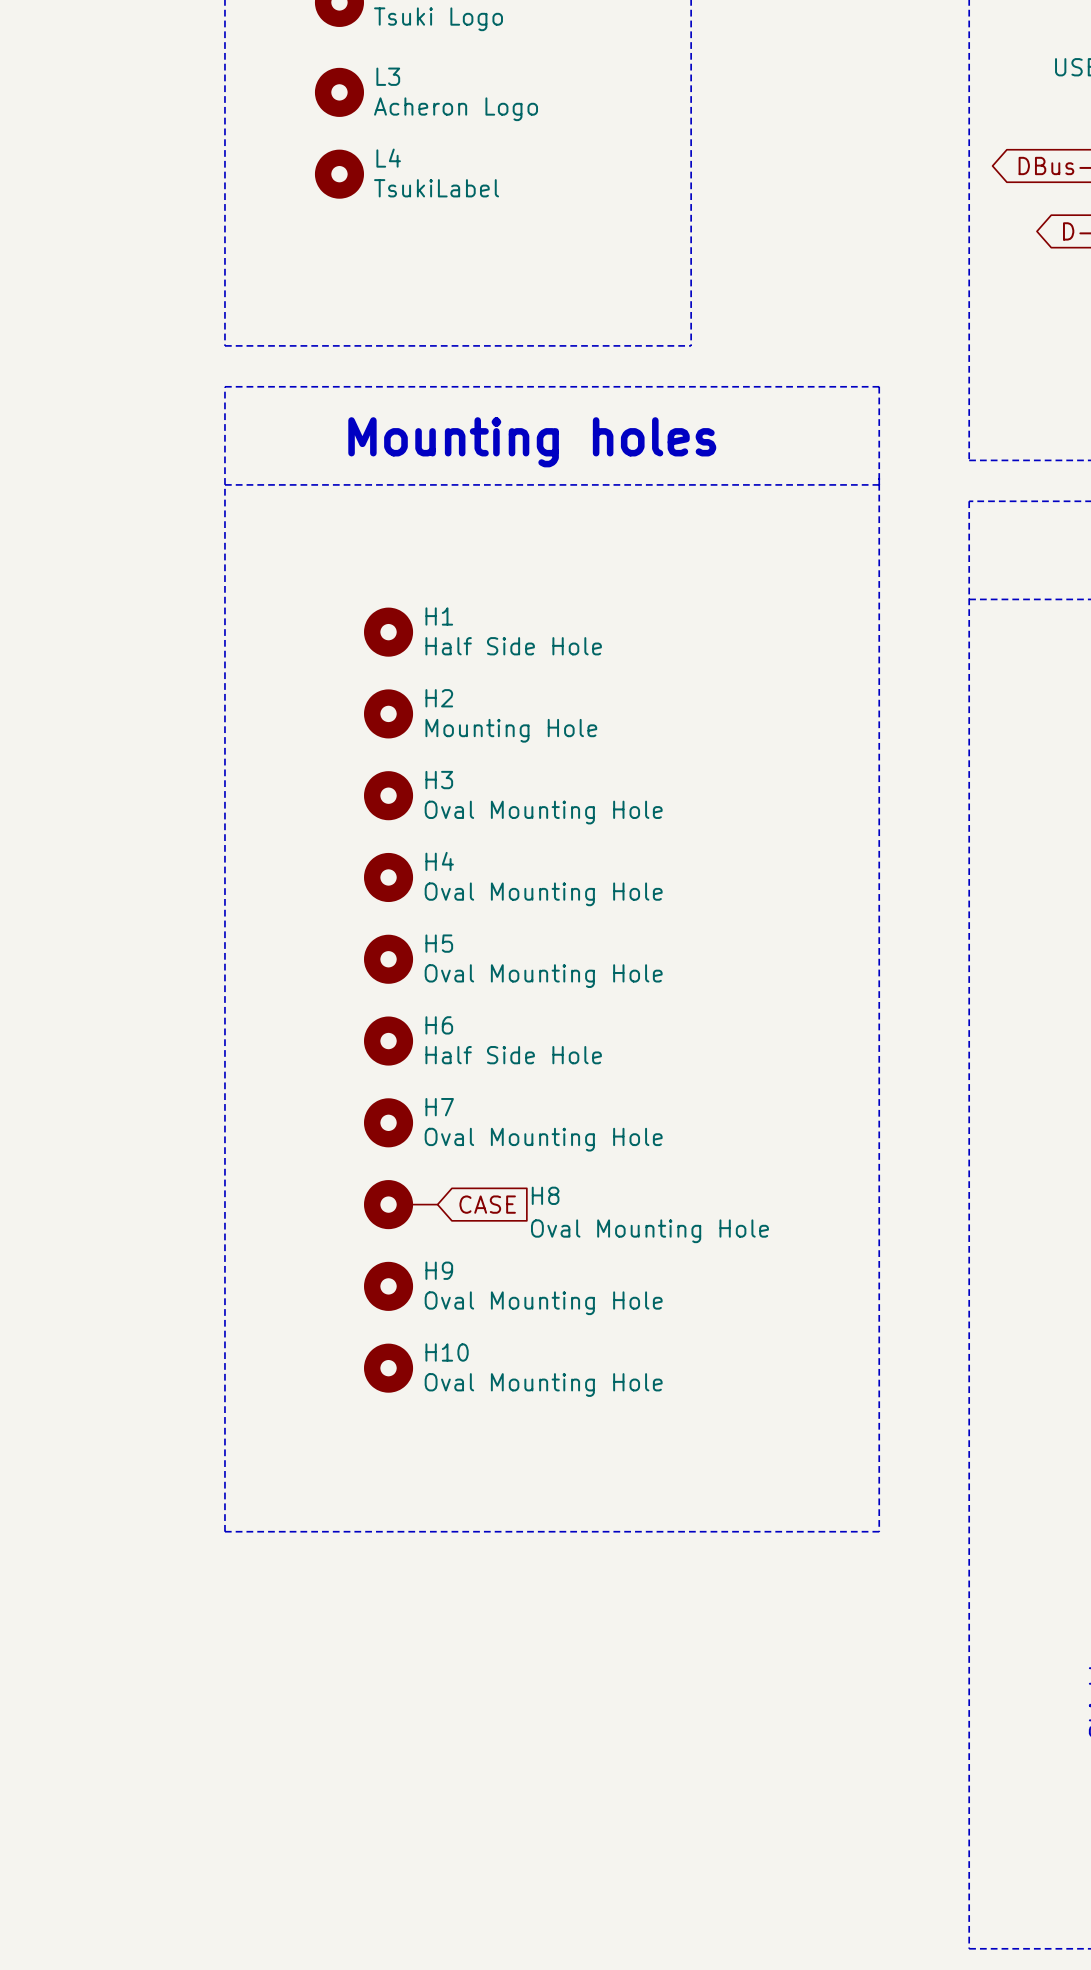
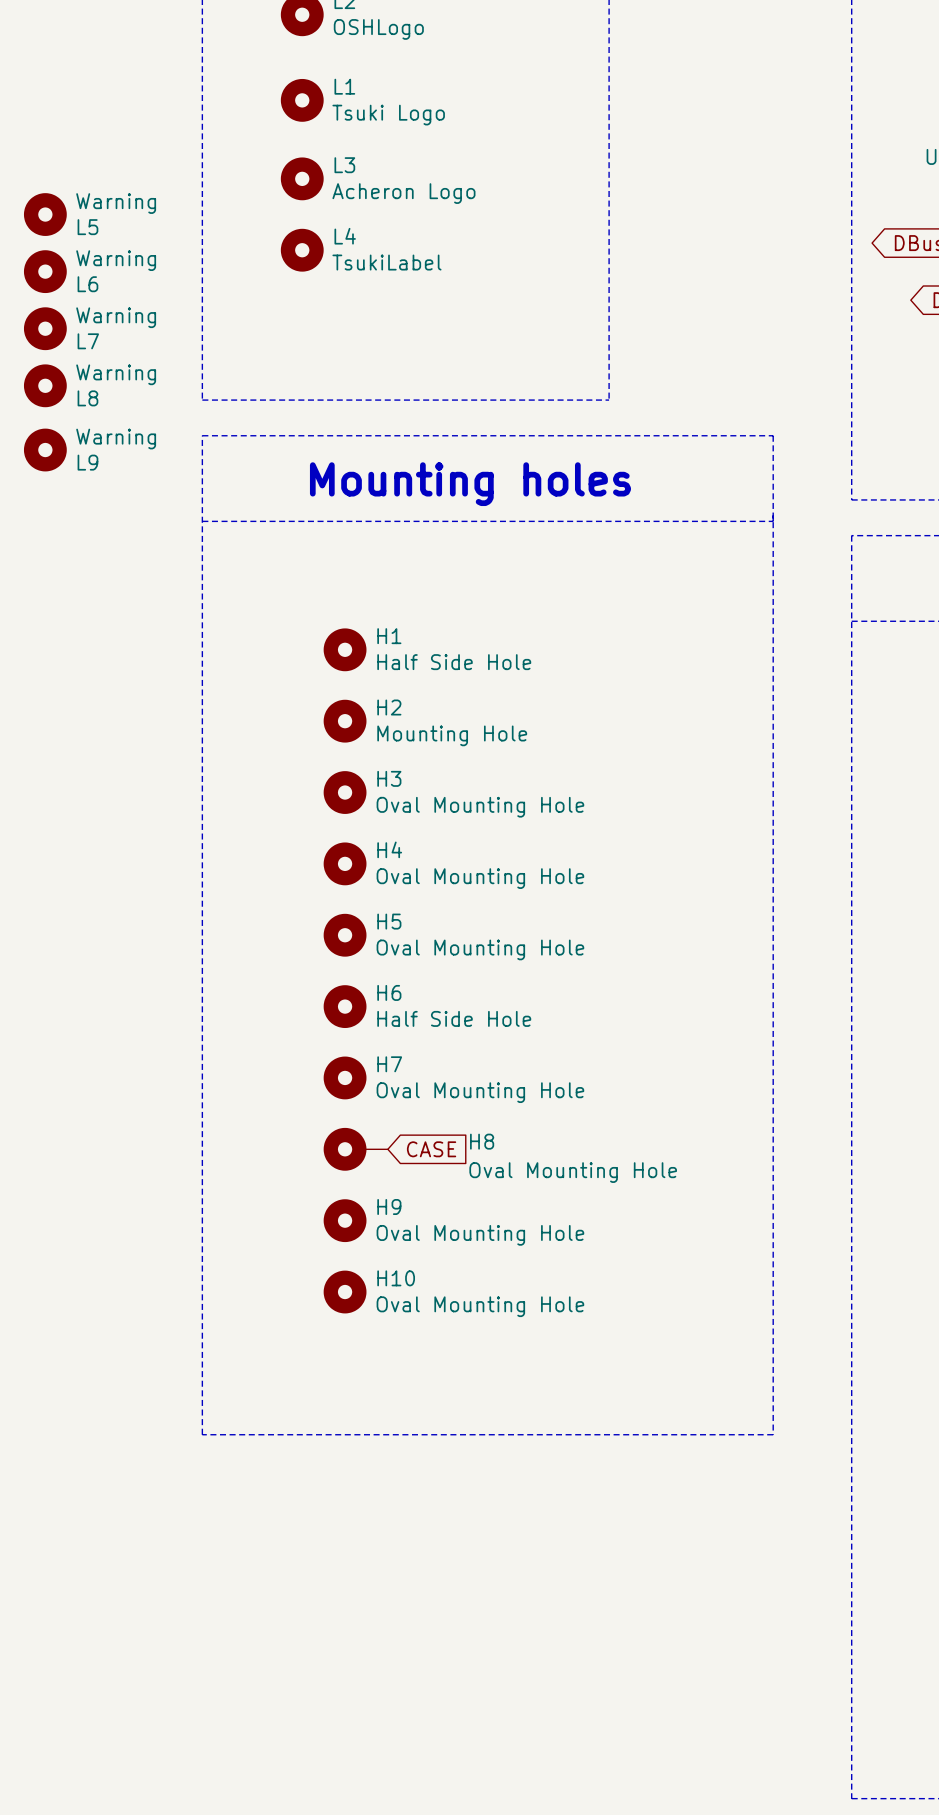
L5: none -> Warning (45, 214)
L6: none -> Warning (45, 271)
L7: none -> Warning (45, 328)
L8: none -> Warning (45, 385)
L9: none -> Warning (45, 450)

